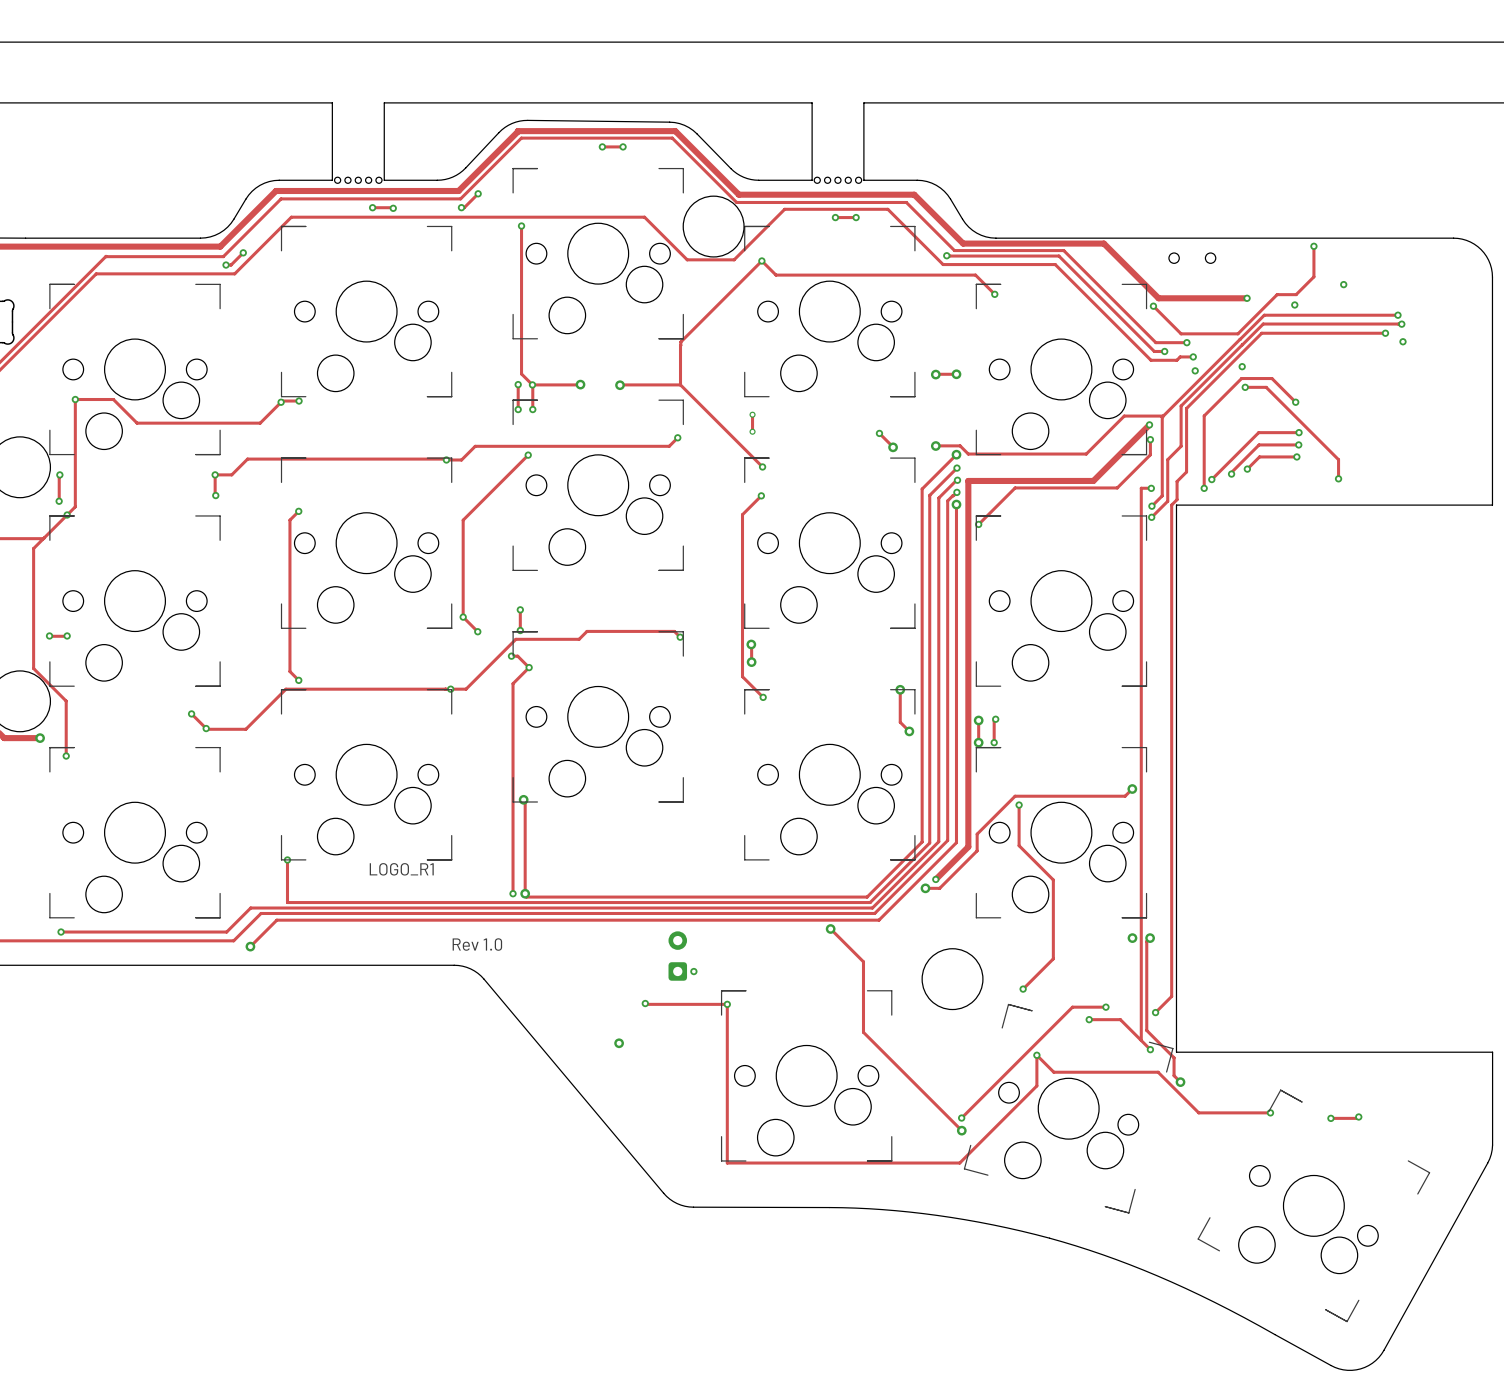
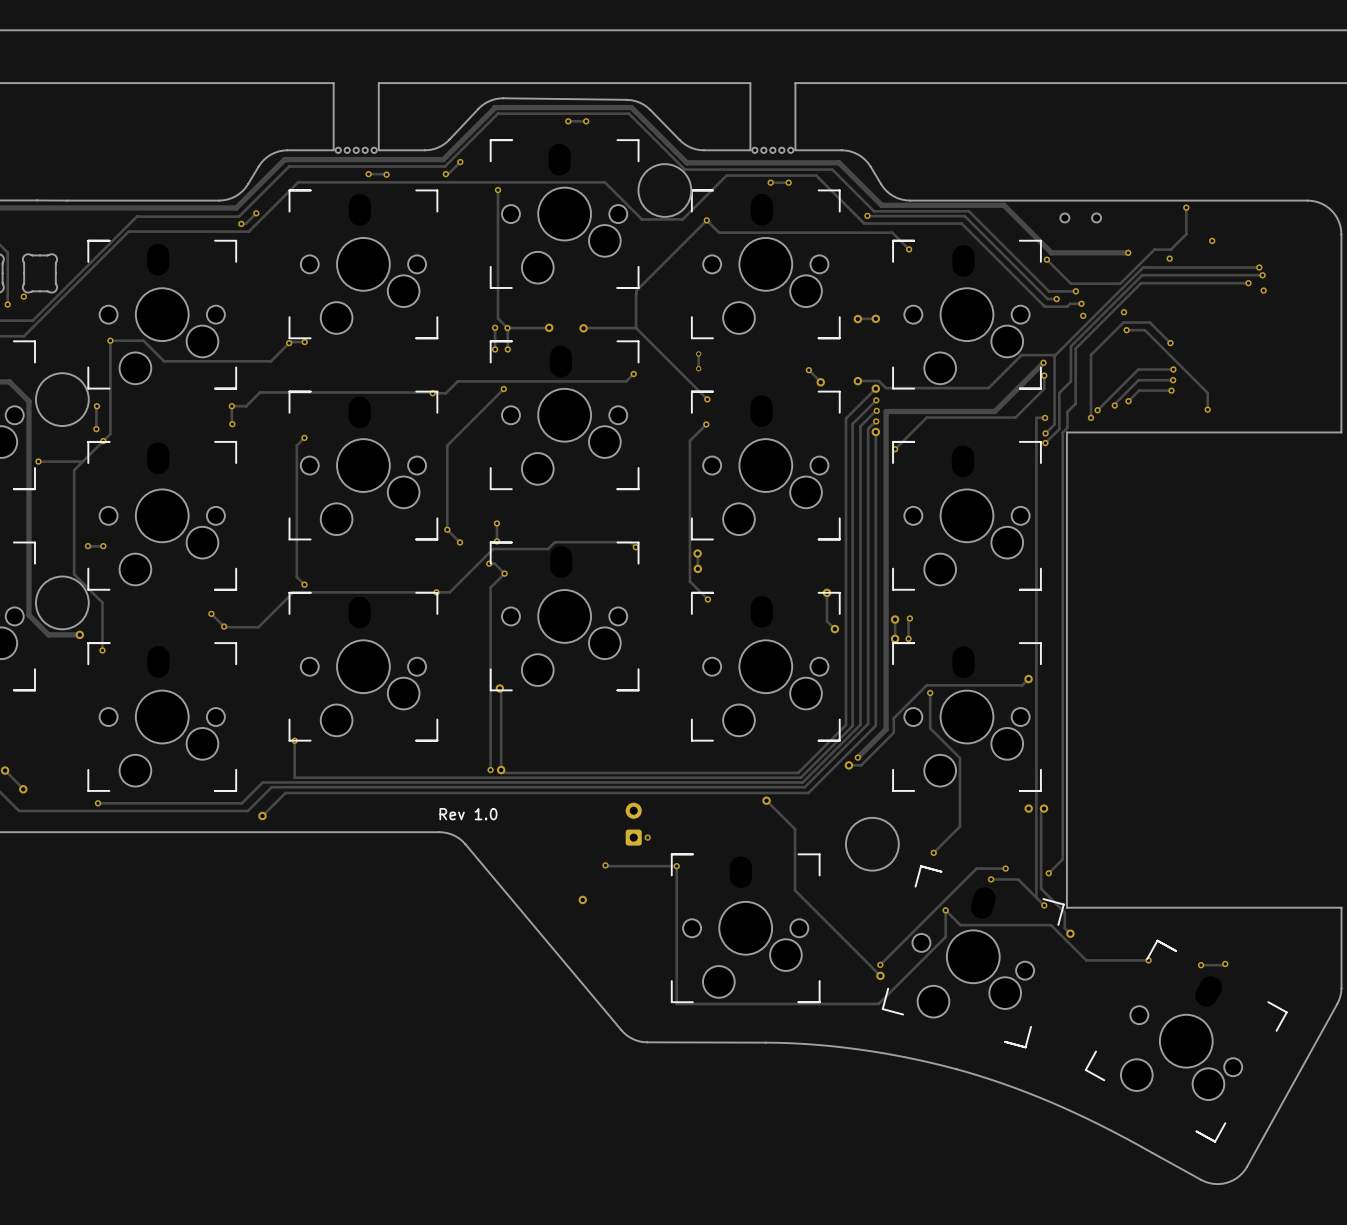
LOGO_R1: (401, 869) -> none

